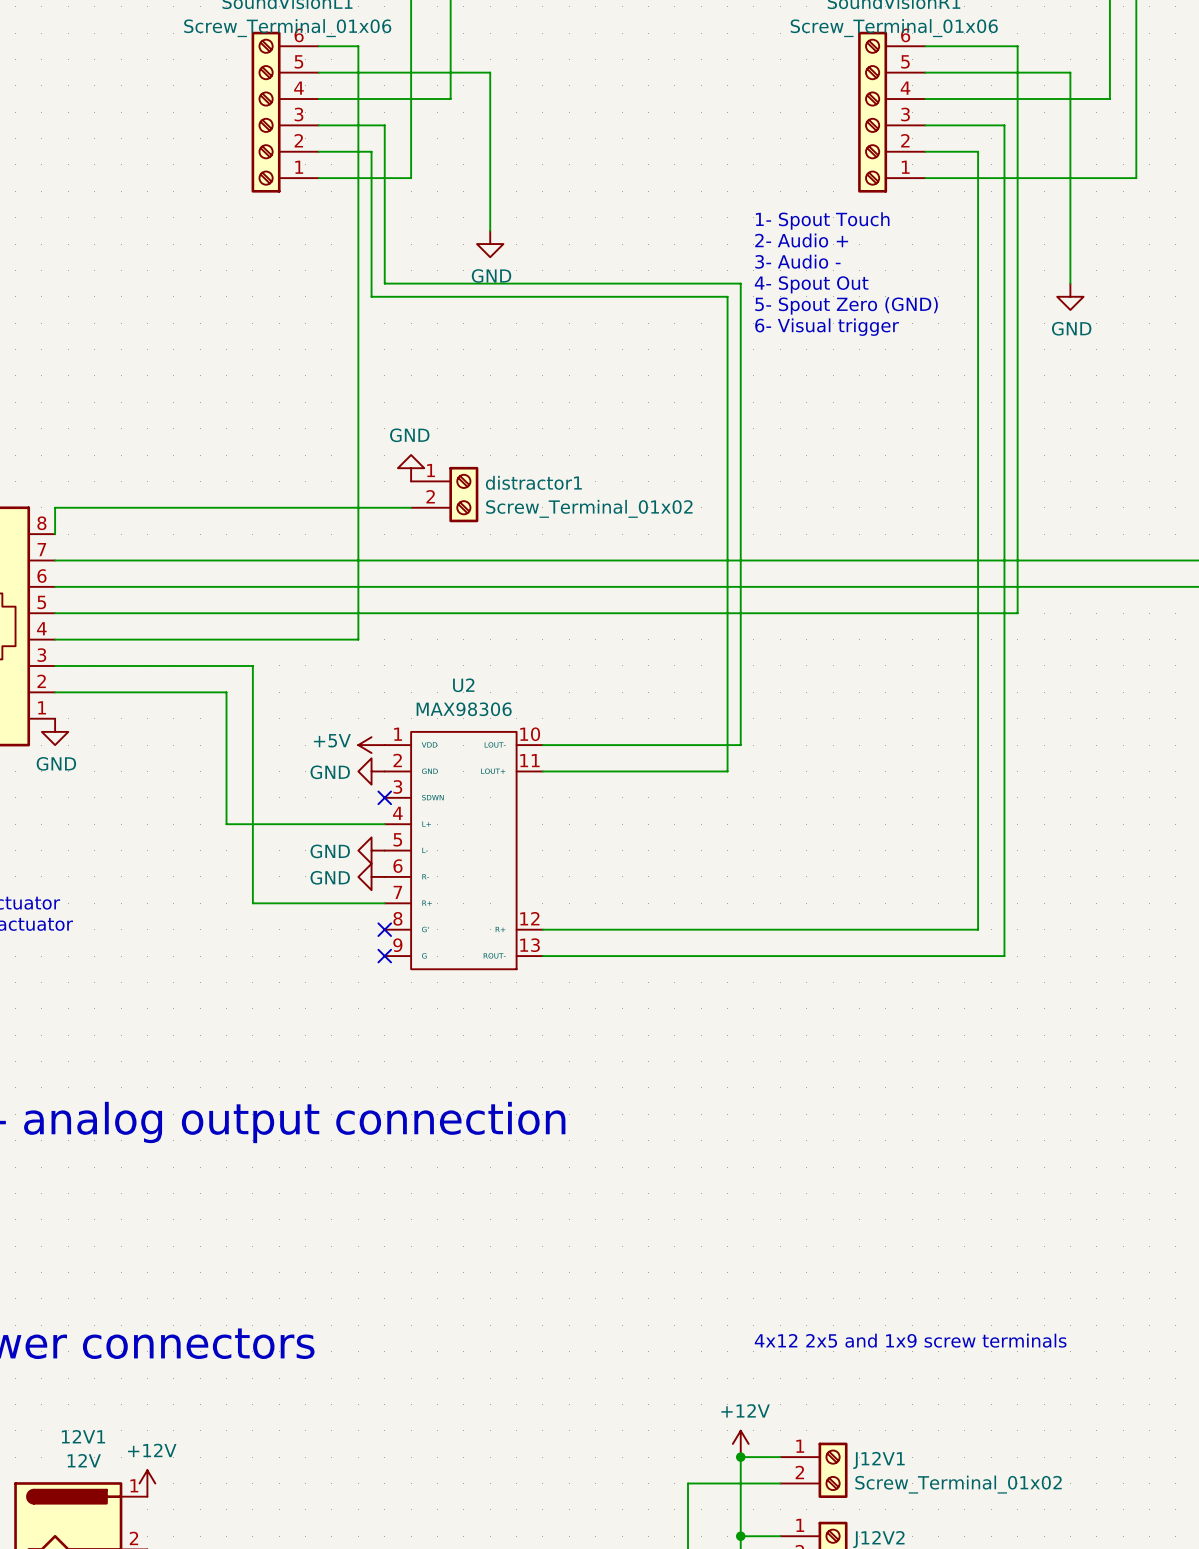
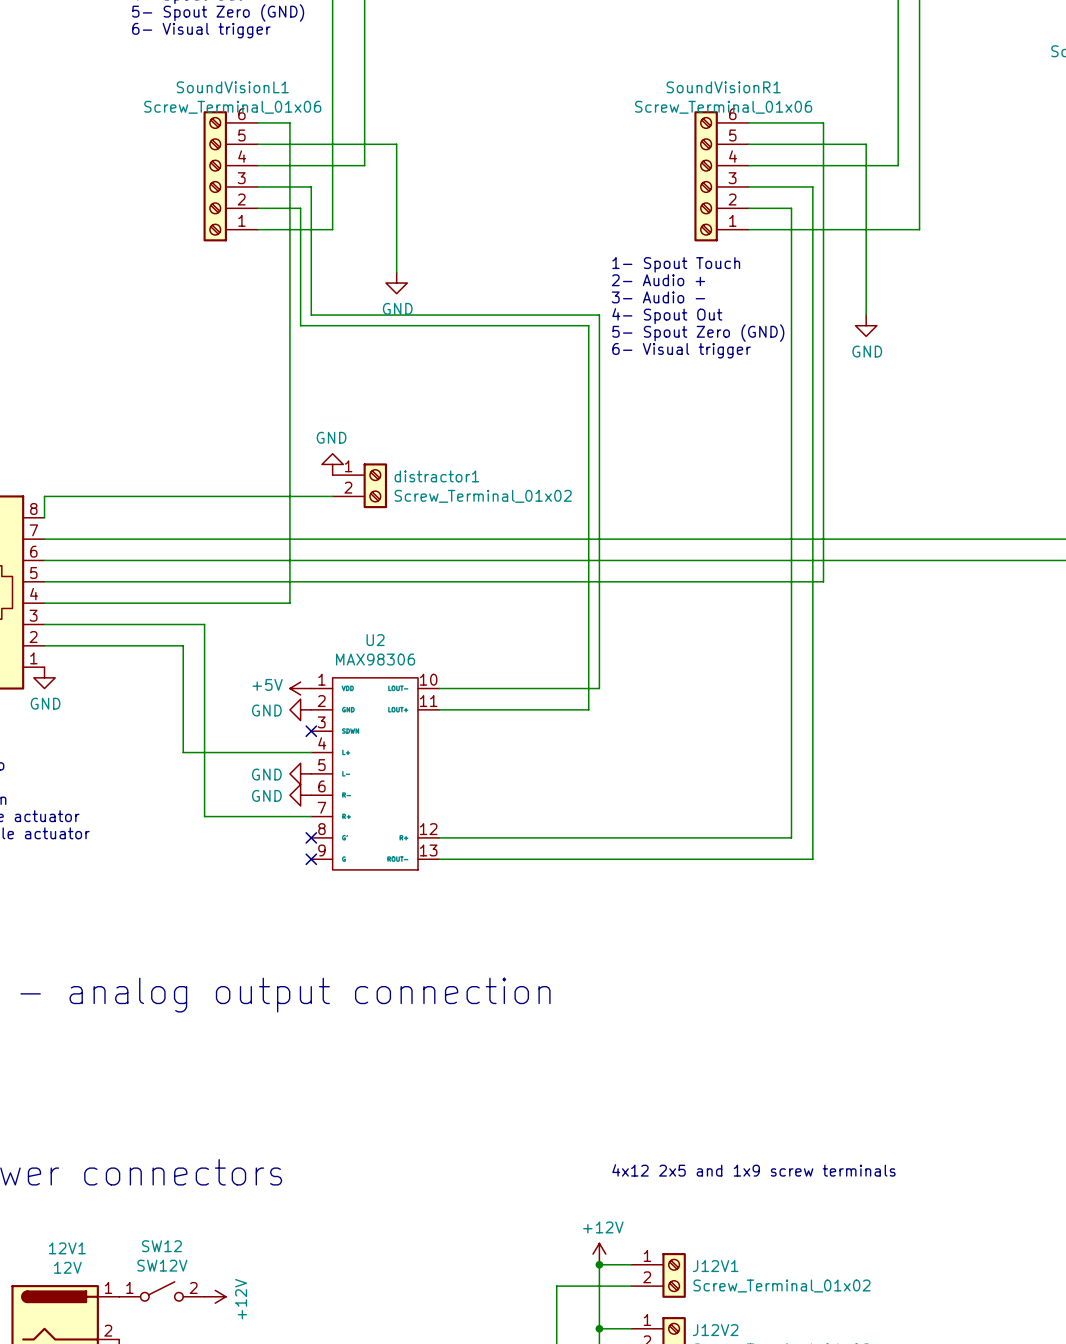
power symbol rotation: 0° (147, 1483) -> 90° clockwise (215, 1296)
power symbol position: +12V (147, 1483) -> +12V (215, 1296)
SW12: none -> SW12V (161, 1291)

